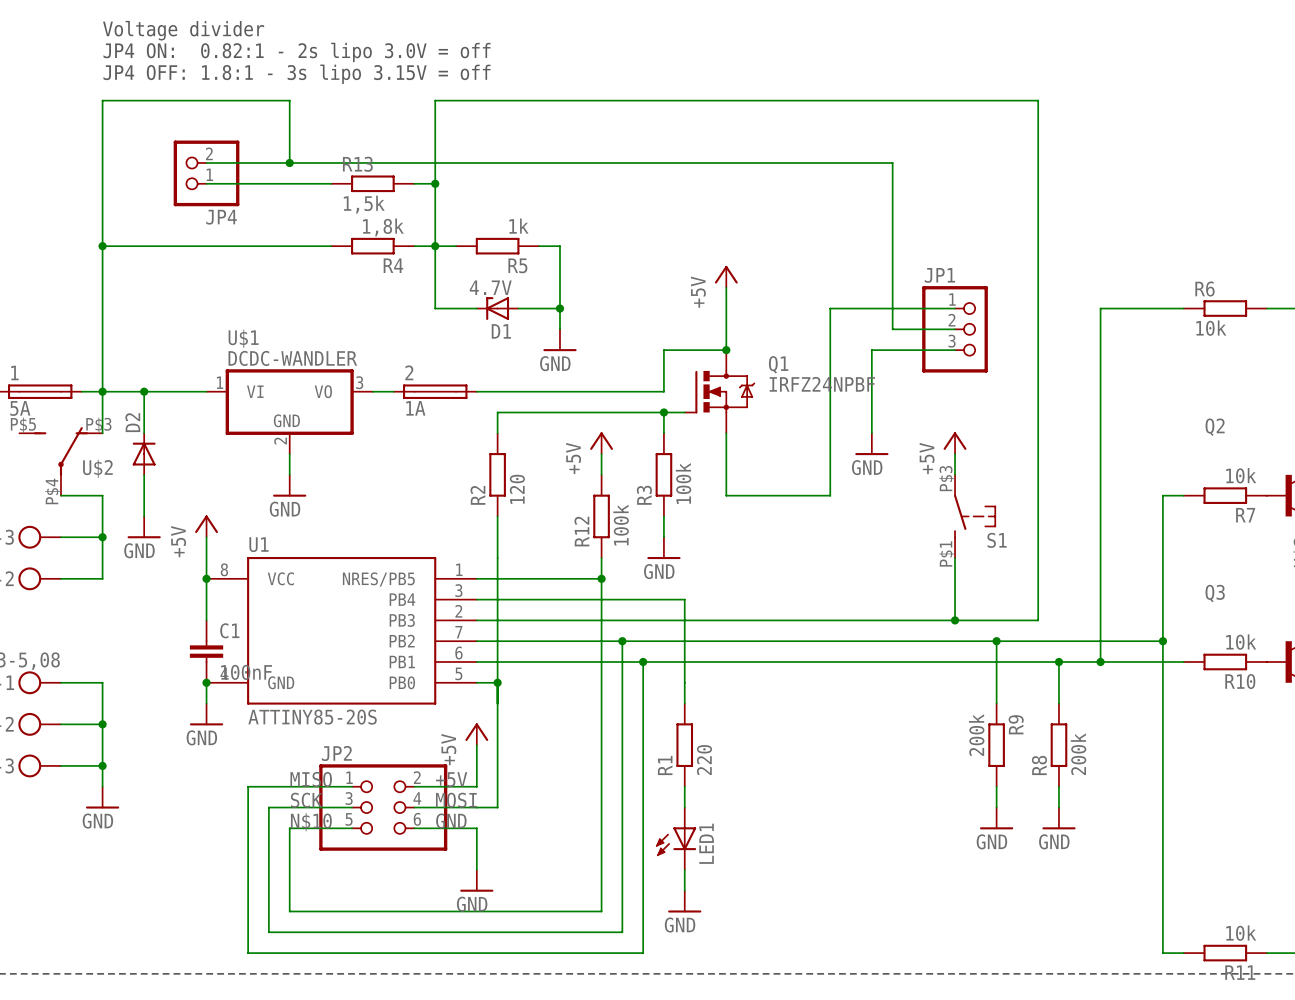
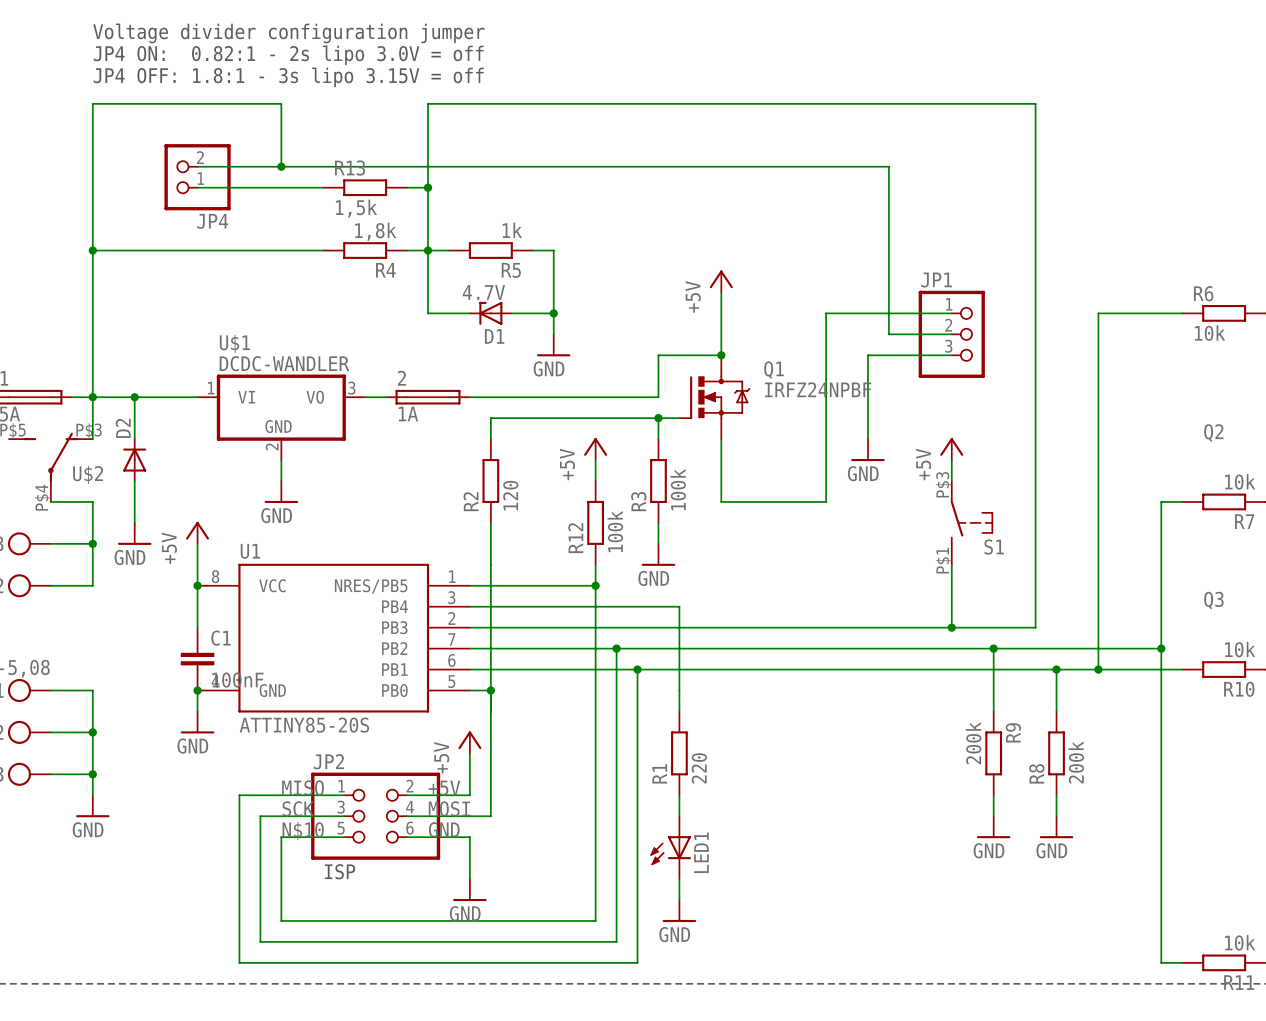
text: Voltage divider (183, 30) -> Voltage divider configuration jumper (288, 33)
text: none -> ISP (340, 871)

